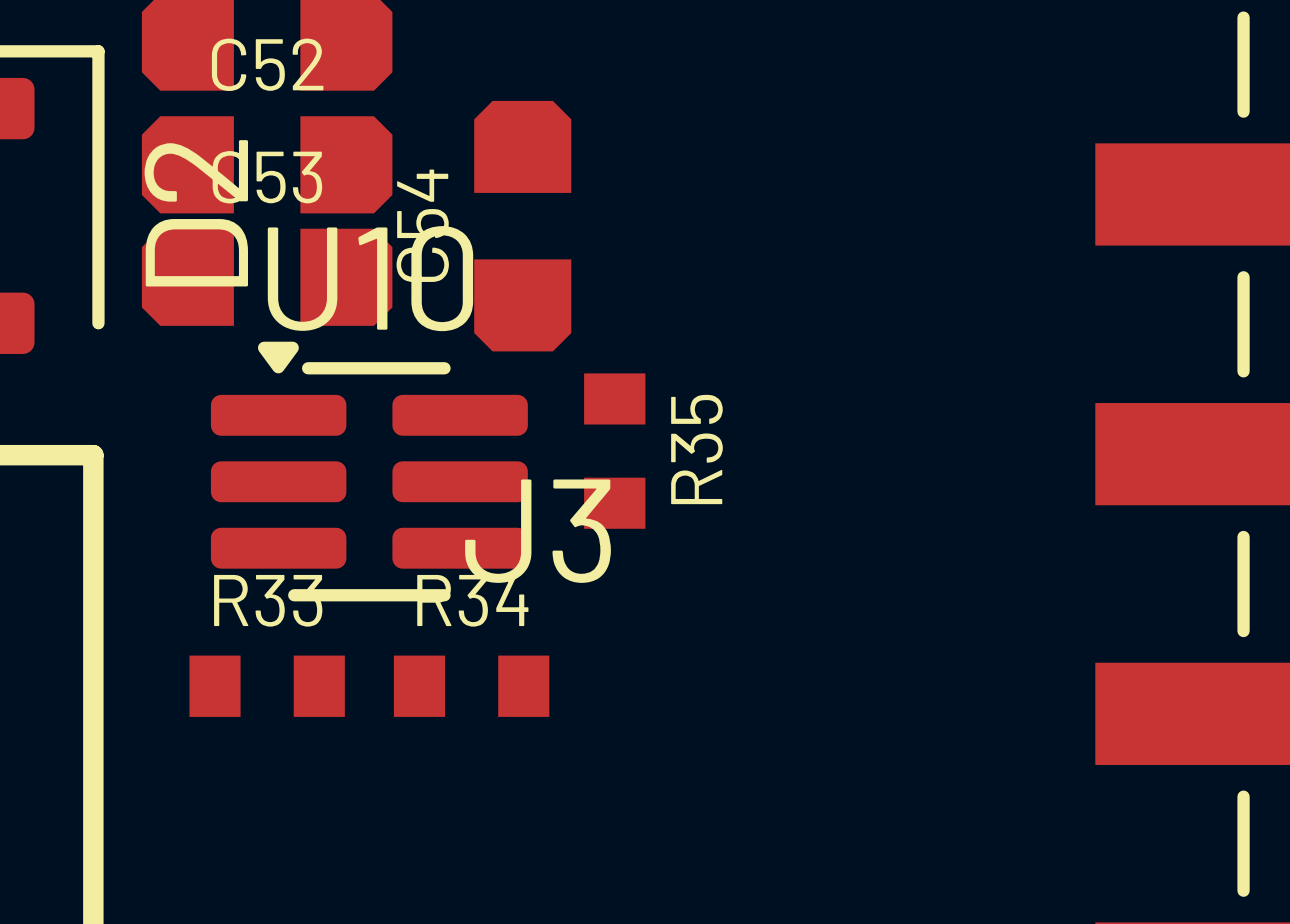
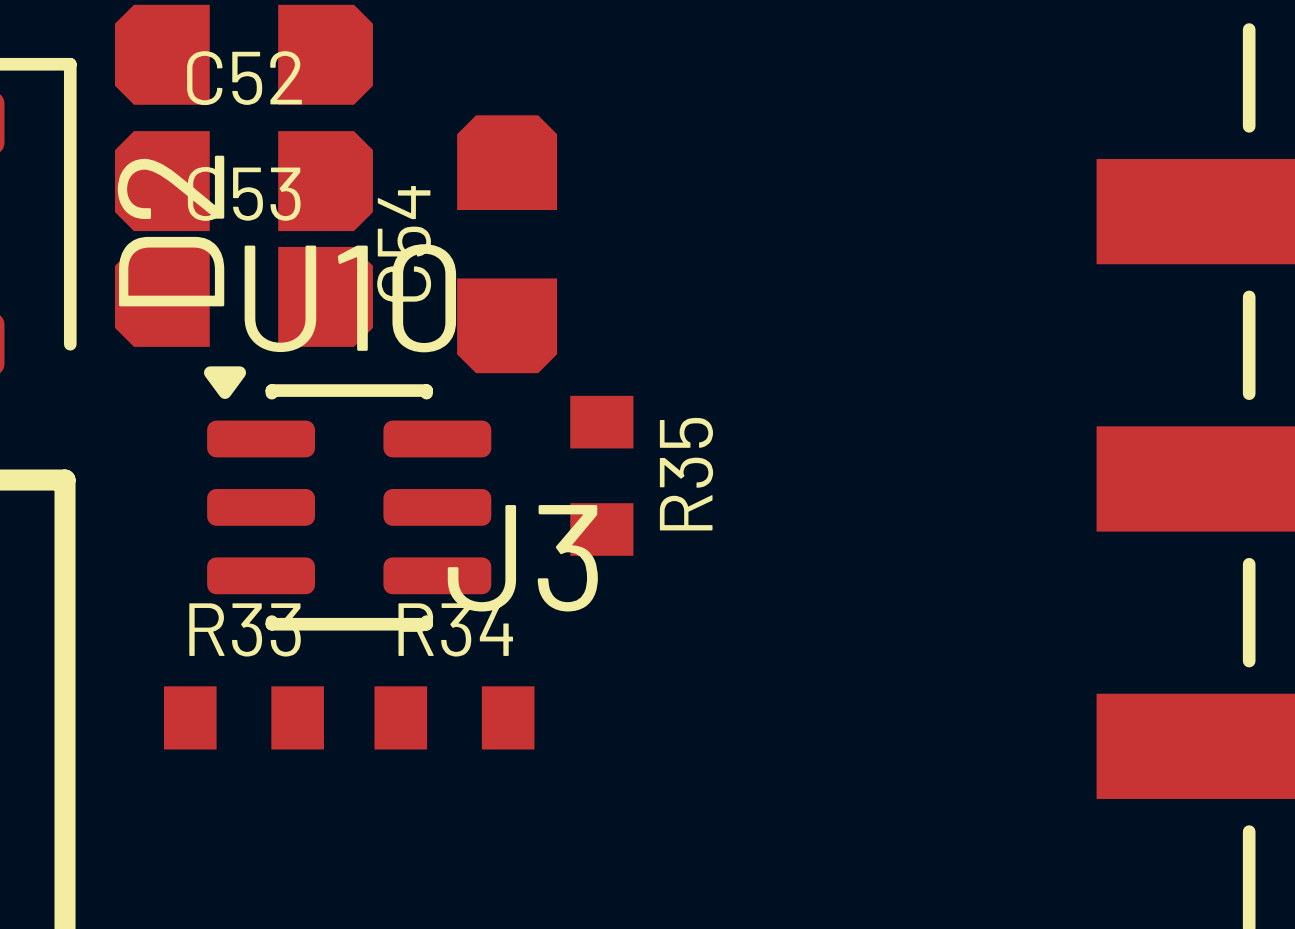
U10 footprint: [210, 341, 528, 602] -> [203, 366, 492, 631]

